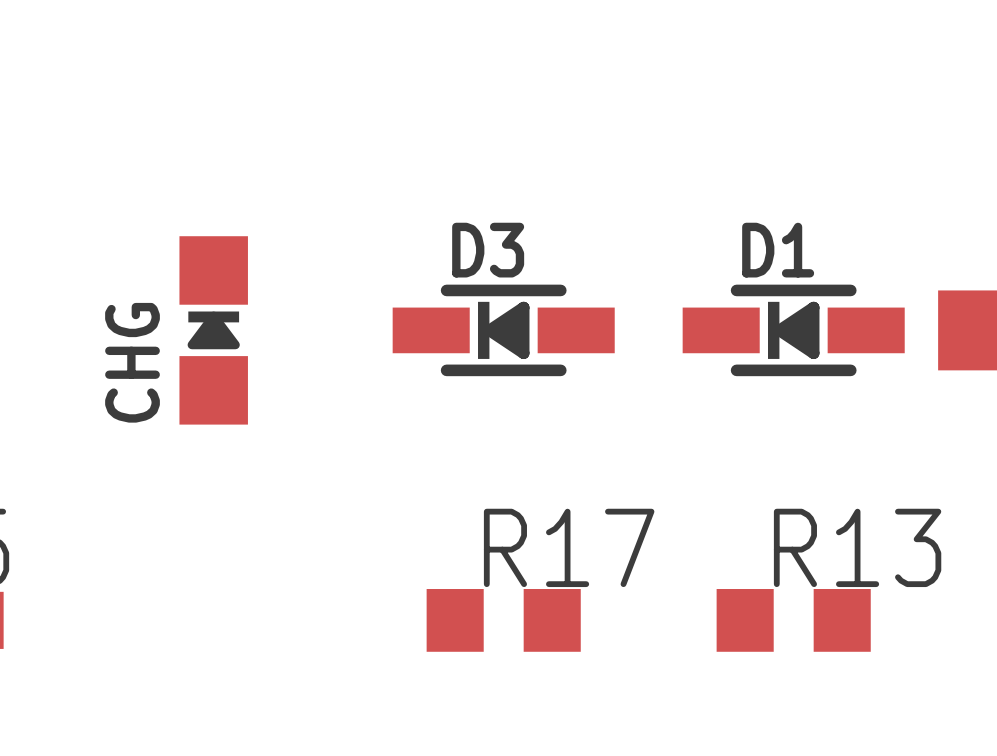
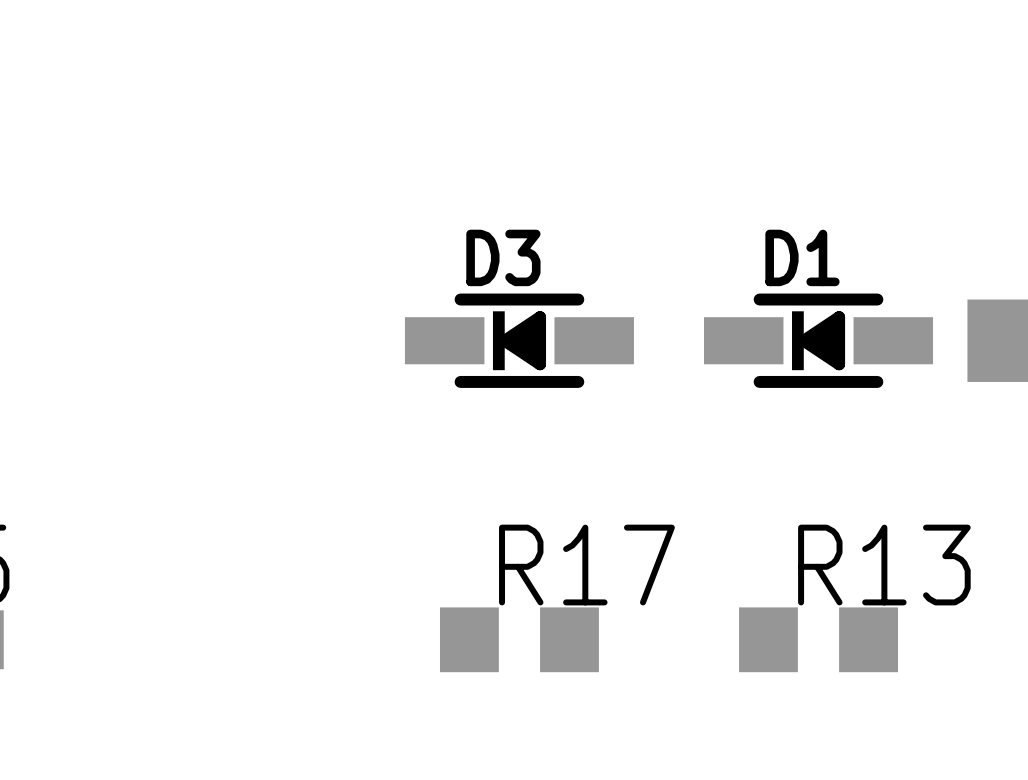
CHG: (213, 330) -> none

